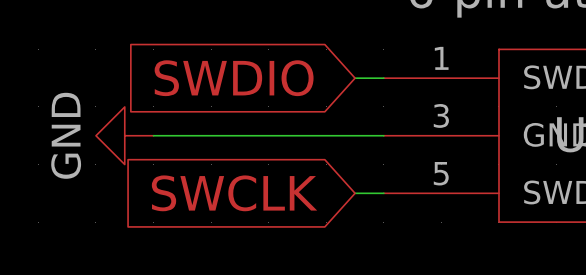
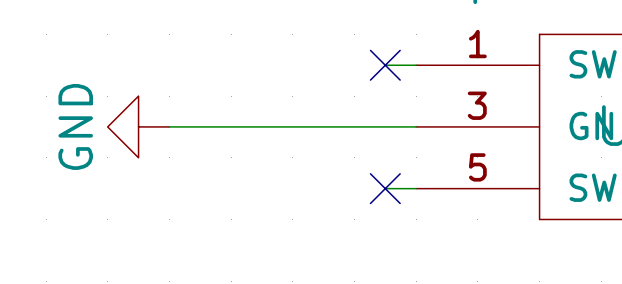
global label: SWDIO (234, 78) -> none
no-connect mark: none -> (385, 65)
global label: SWCLK (234, 193) -> none
no-connect mark: none -> (385, 188)

